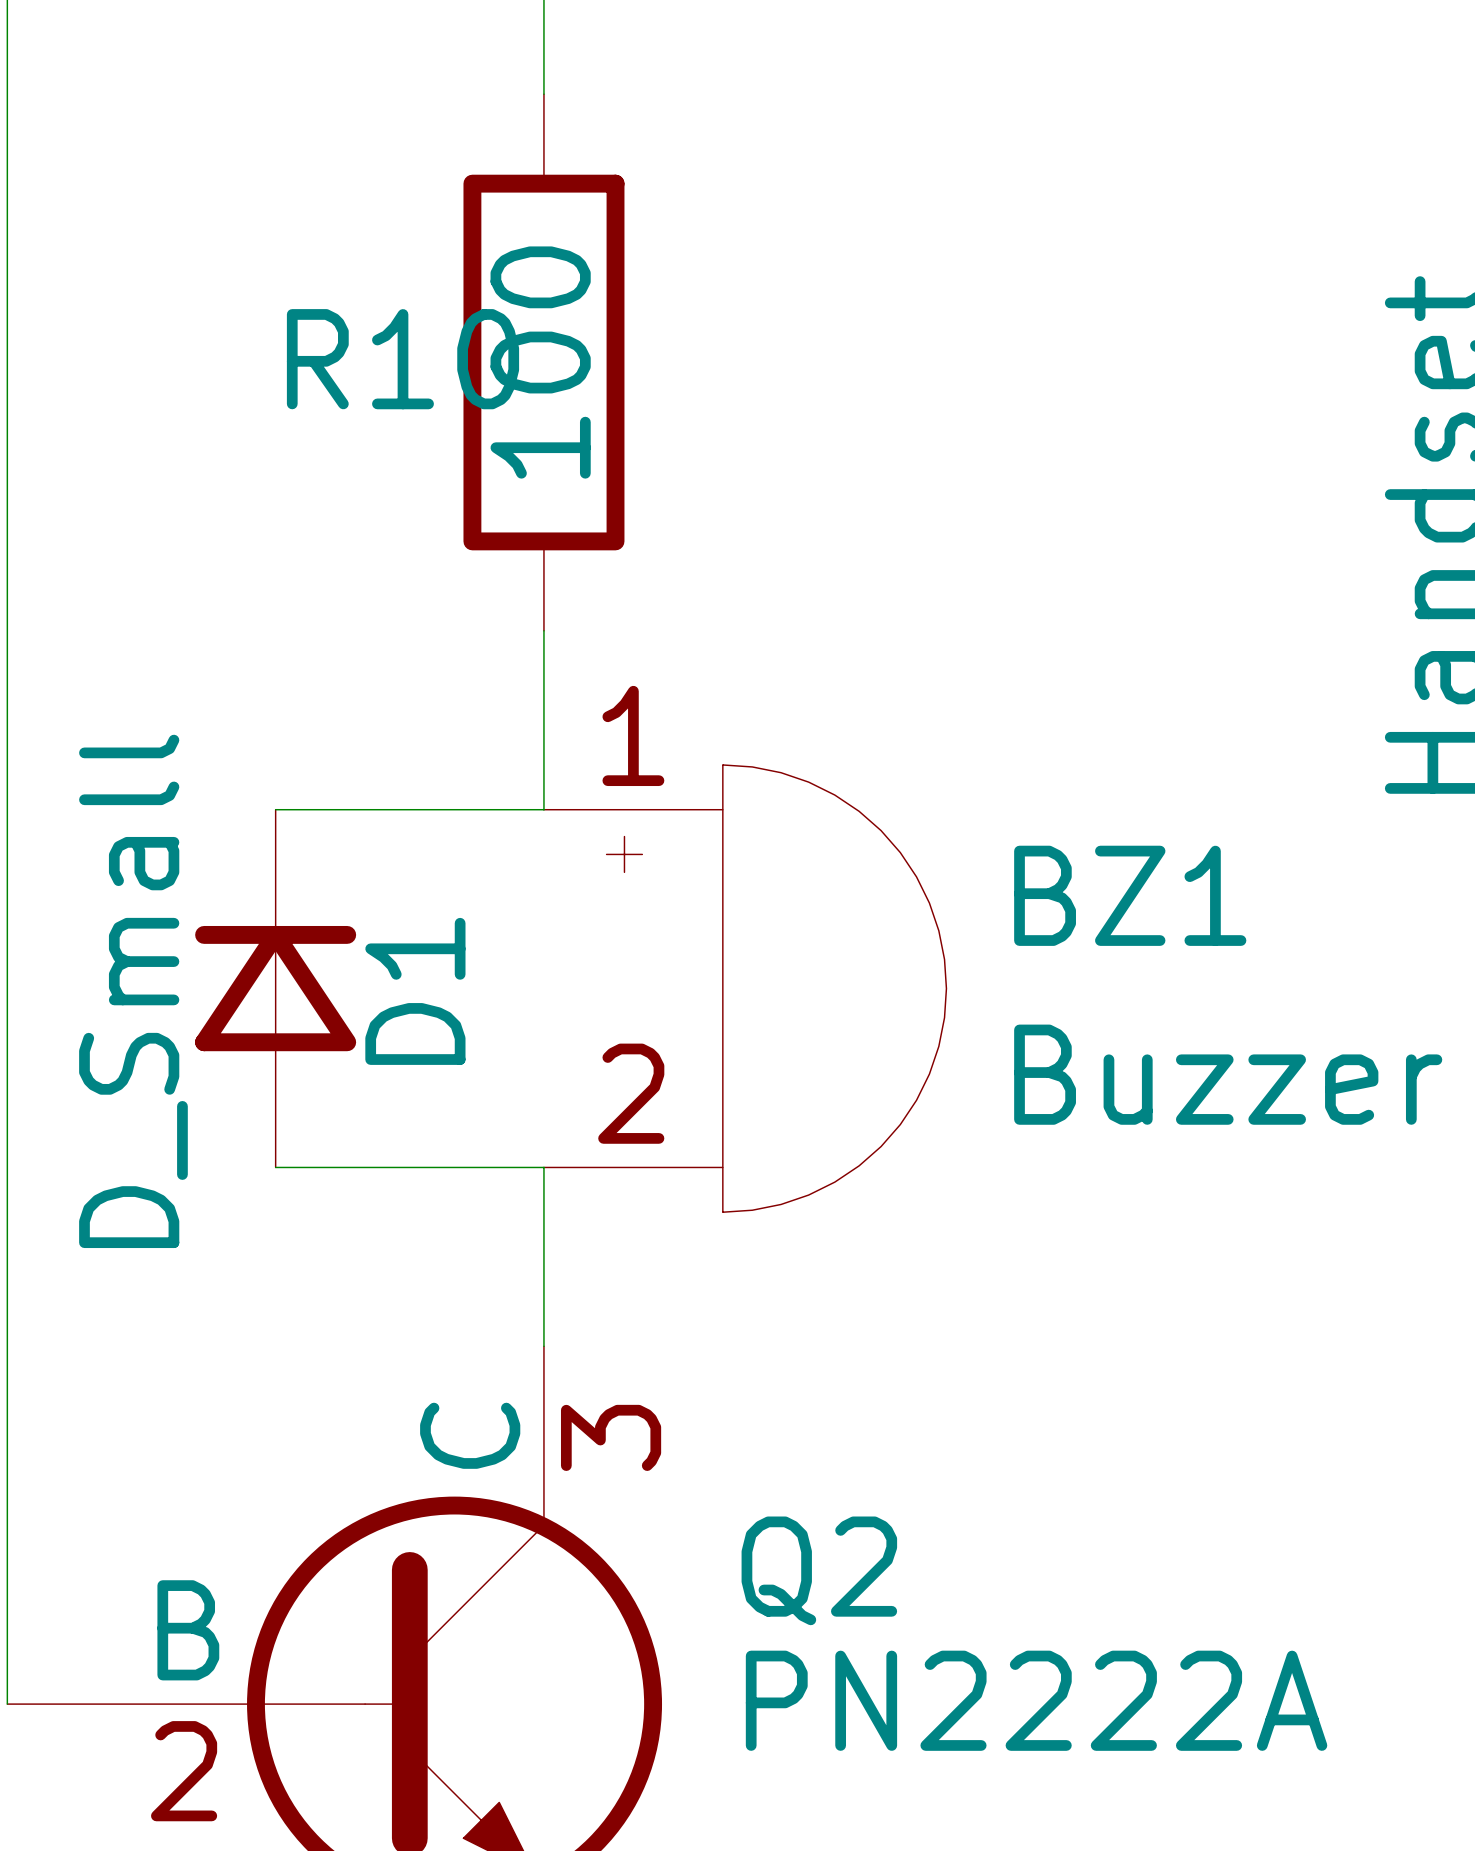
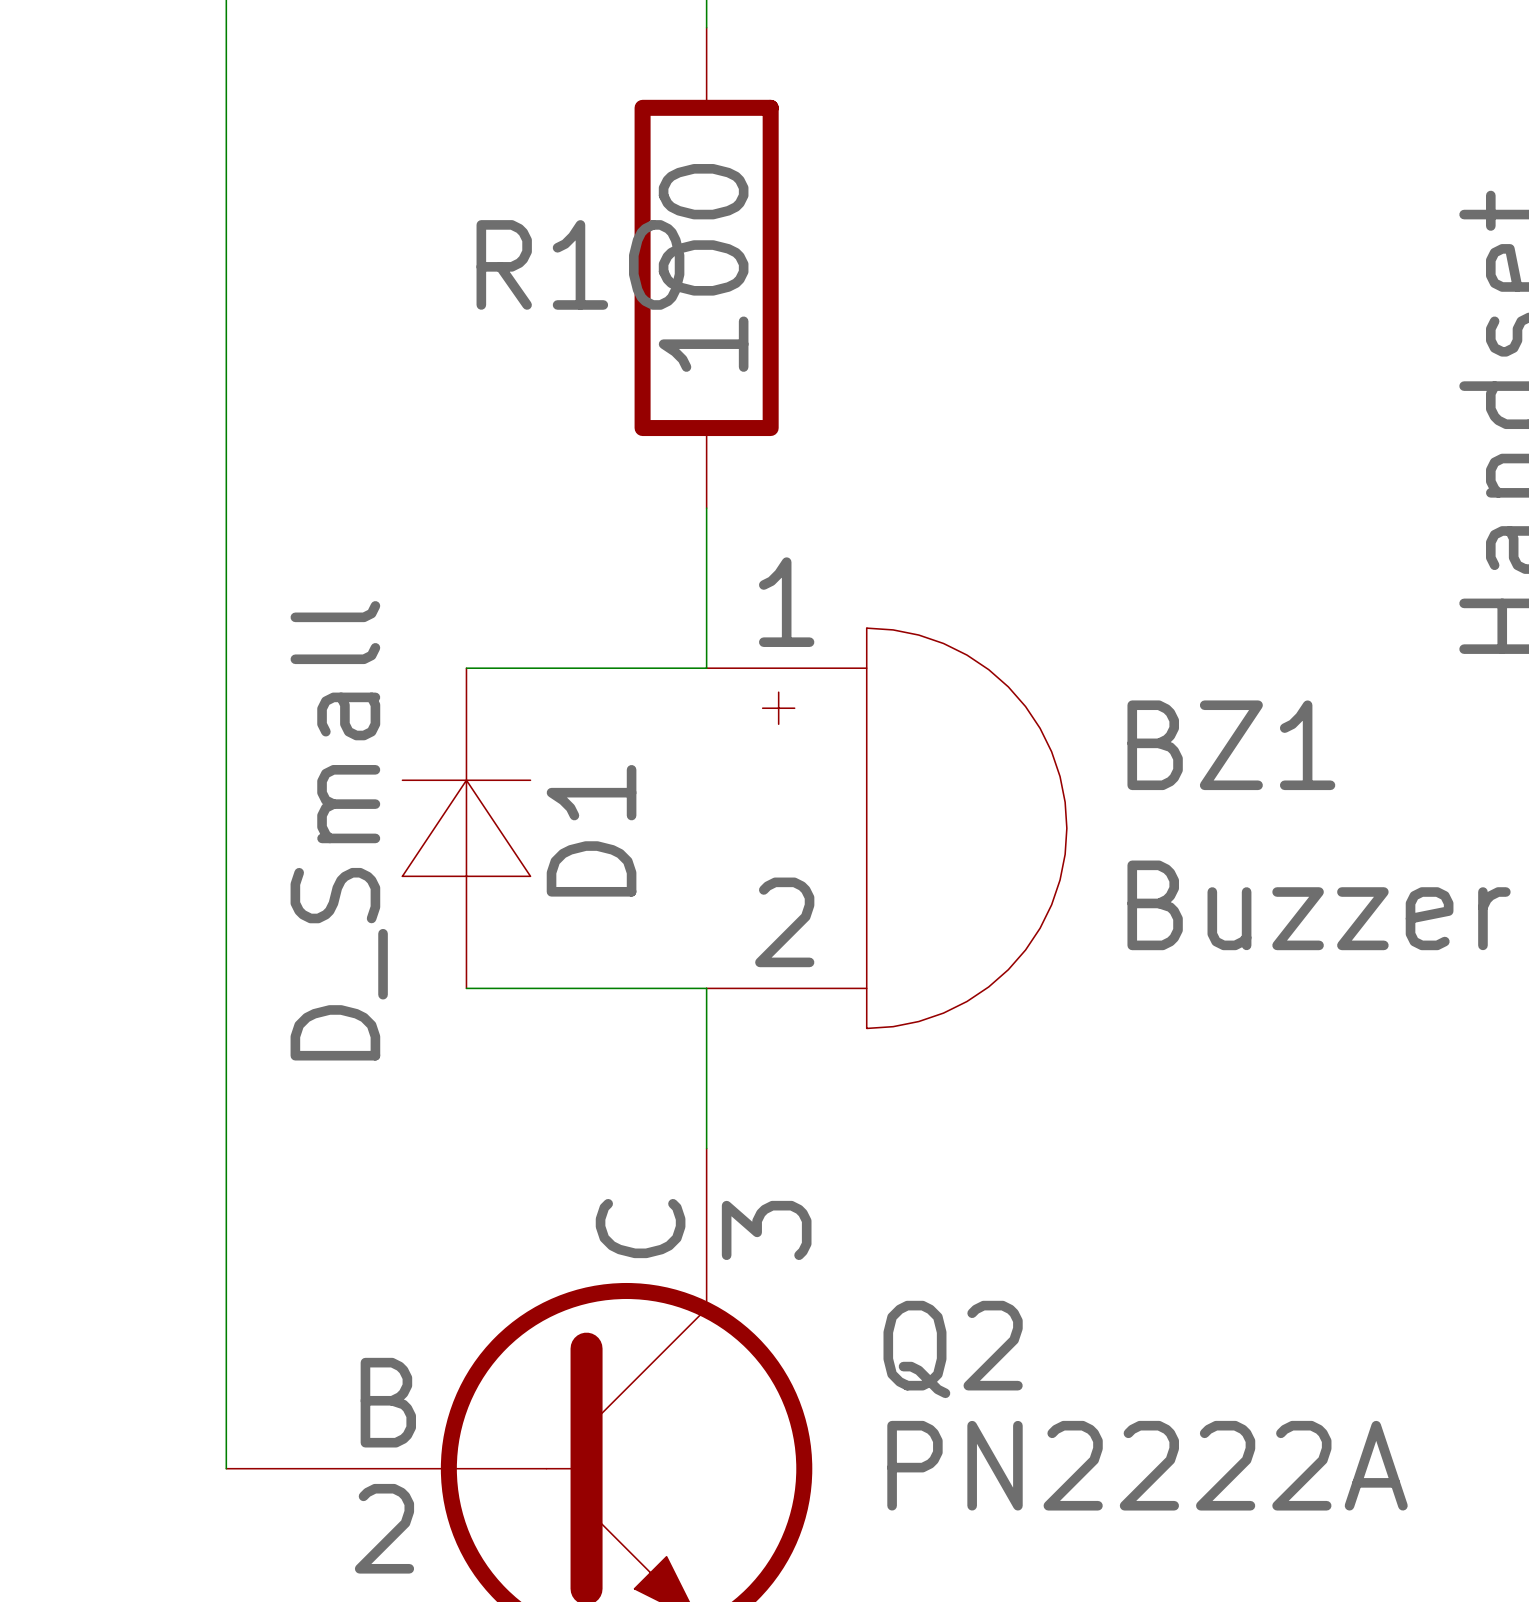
D1 symbol: [195, 809, 357, 1168] -> [402, 668, 531, 989]

